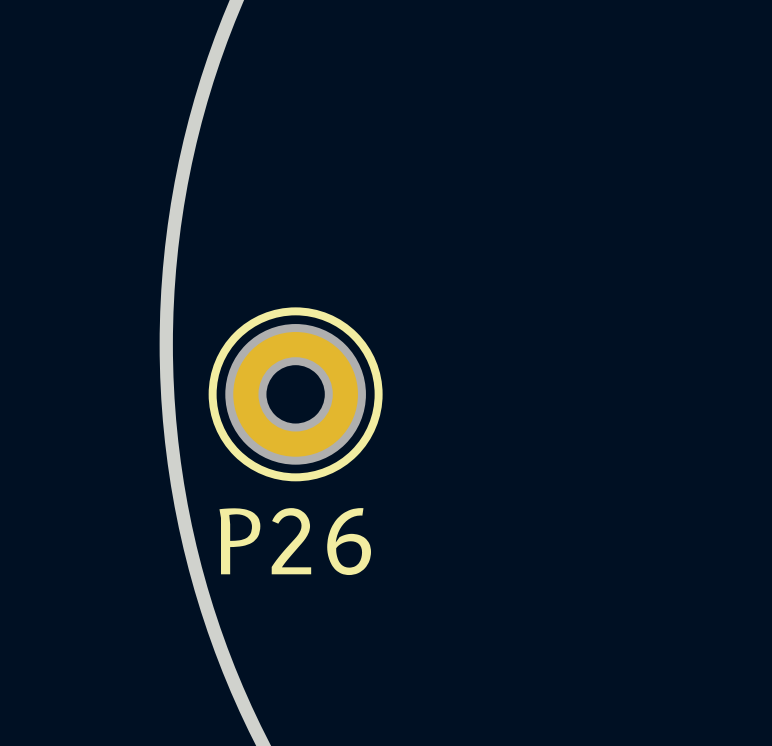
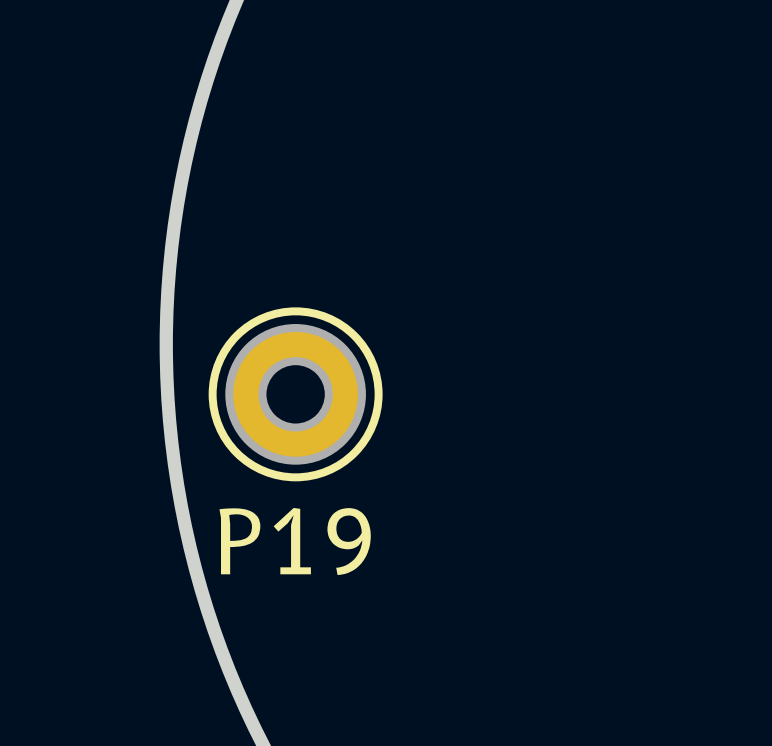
P26 name: P26 (295, 541) -> P19 (295, 541)

